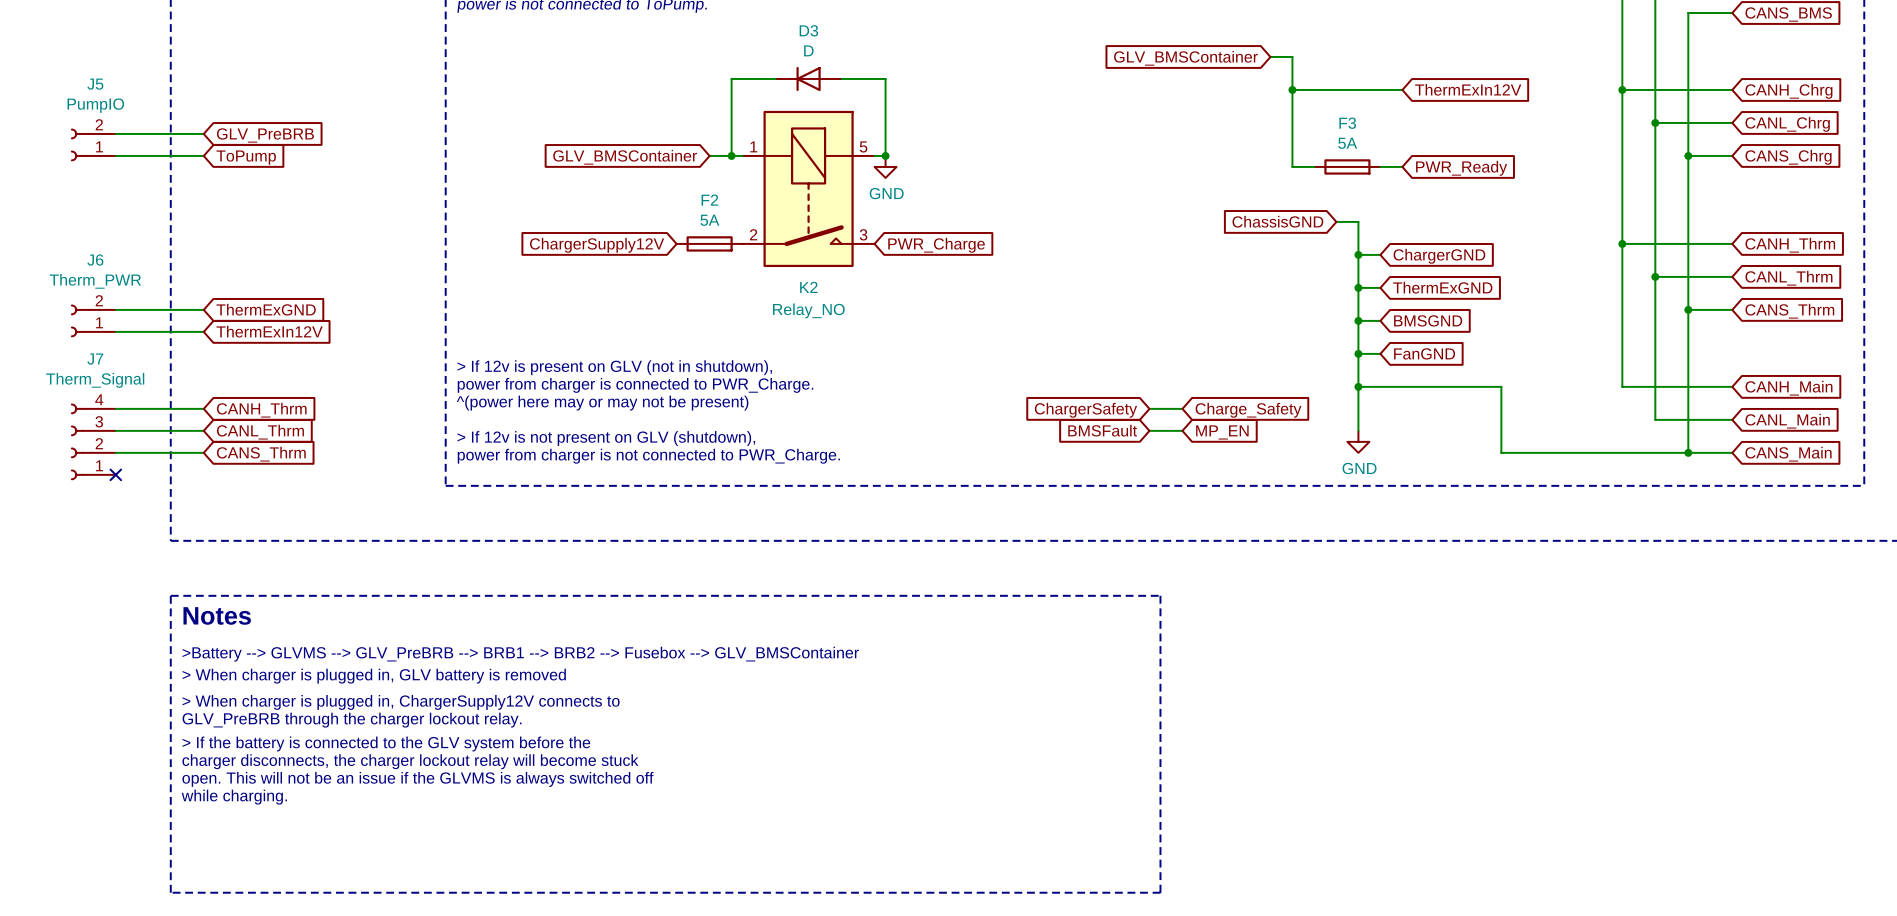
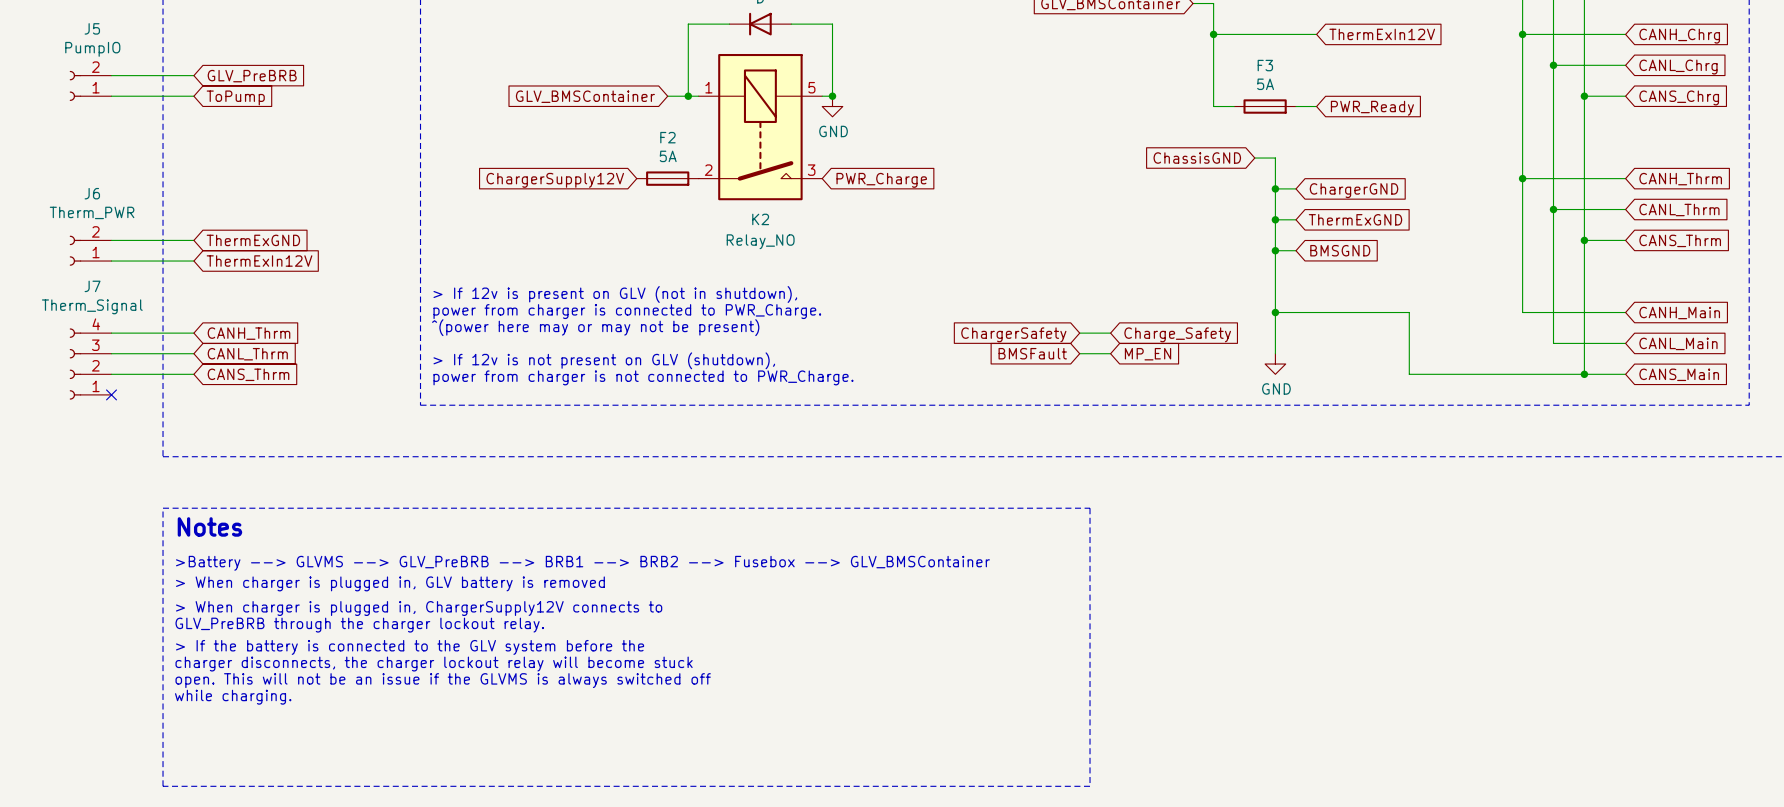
wire: (1358, 353) (1380, 353) -> none
junction: (1358, 353) -> none
global label: FanGND (1424, 353) -> none

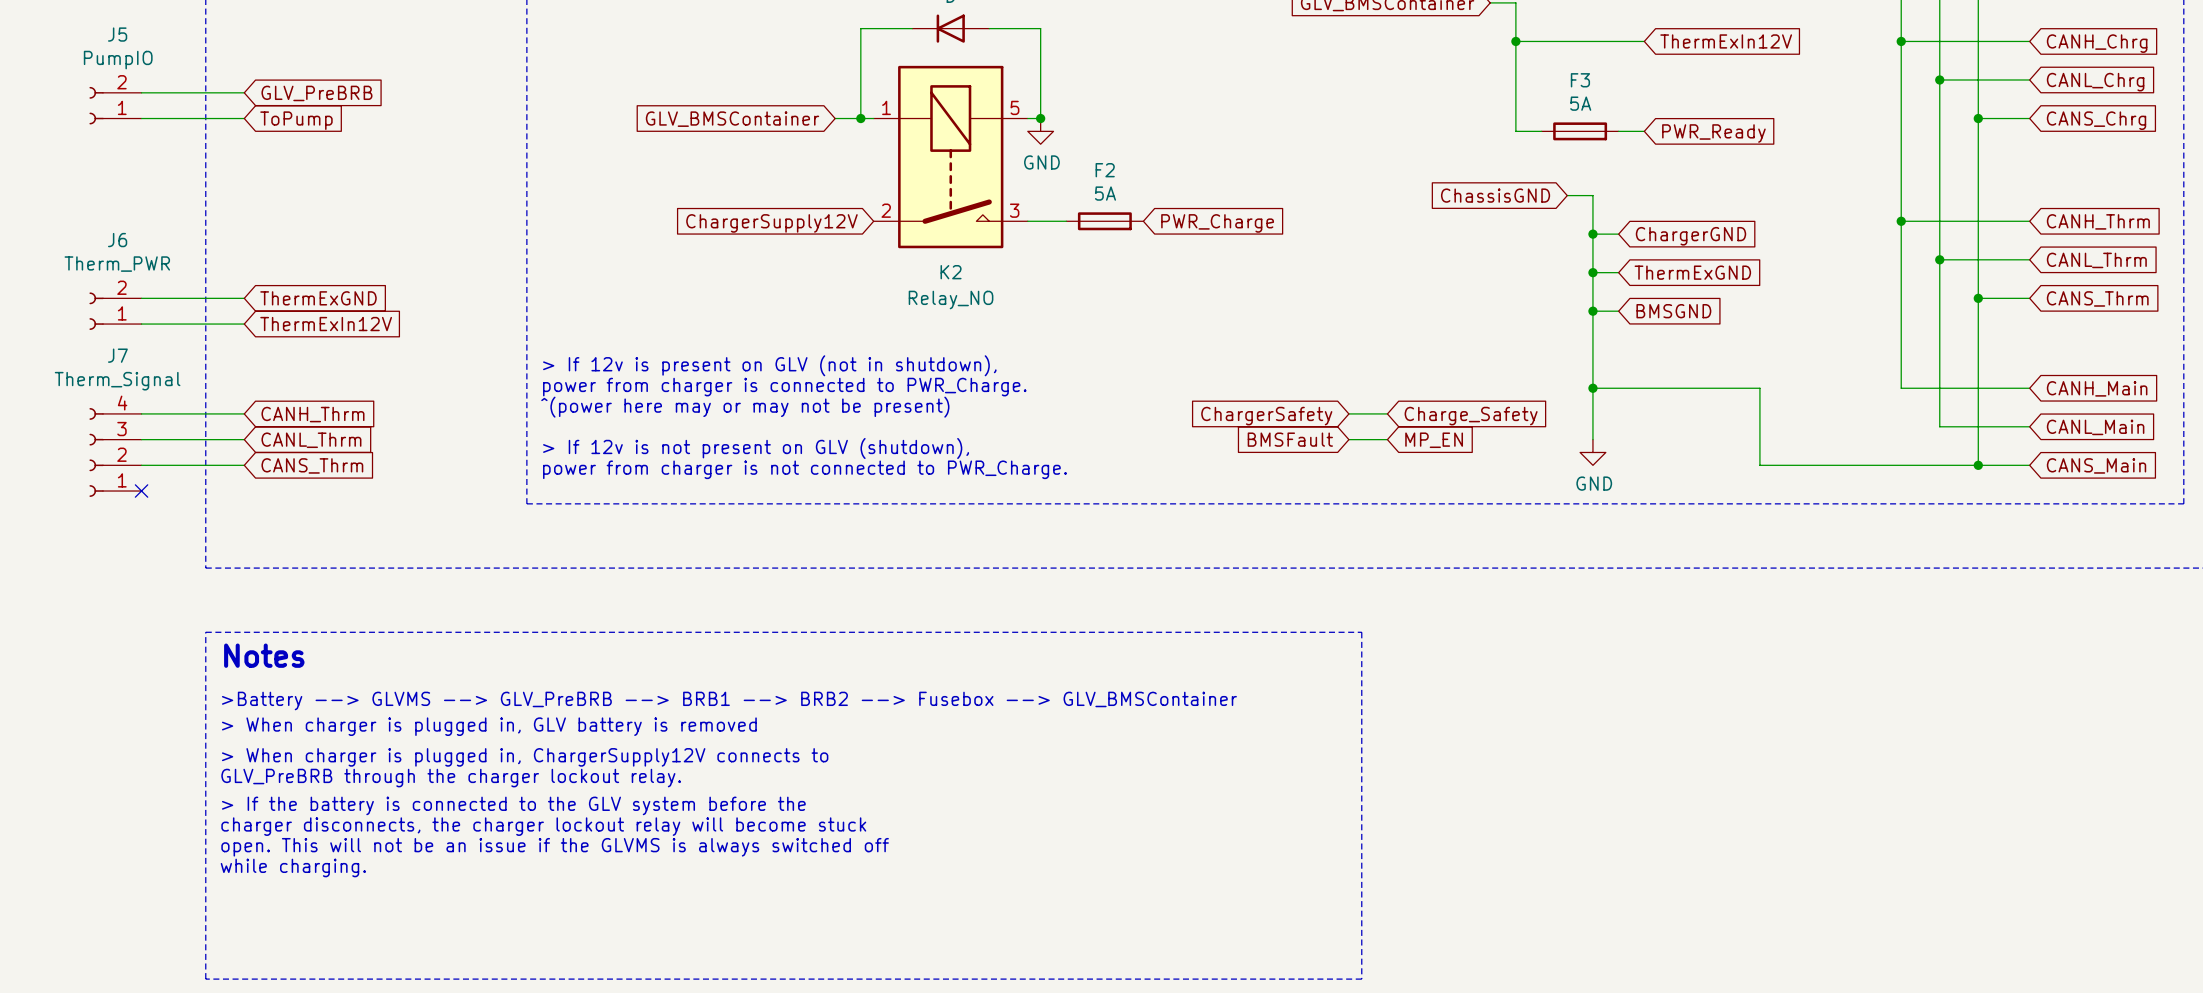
F2 position: (667, 178) -> (1104, 221)
wire: none -> (1027, 221) (1066, 221)
global label position: ChargerSupply12V (555, 180) -> ChargerSupply12V (771, 223)
global label position: PWR_Charge (881, 180) -> PWR_Charge (1217, 223)

